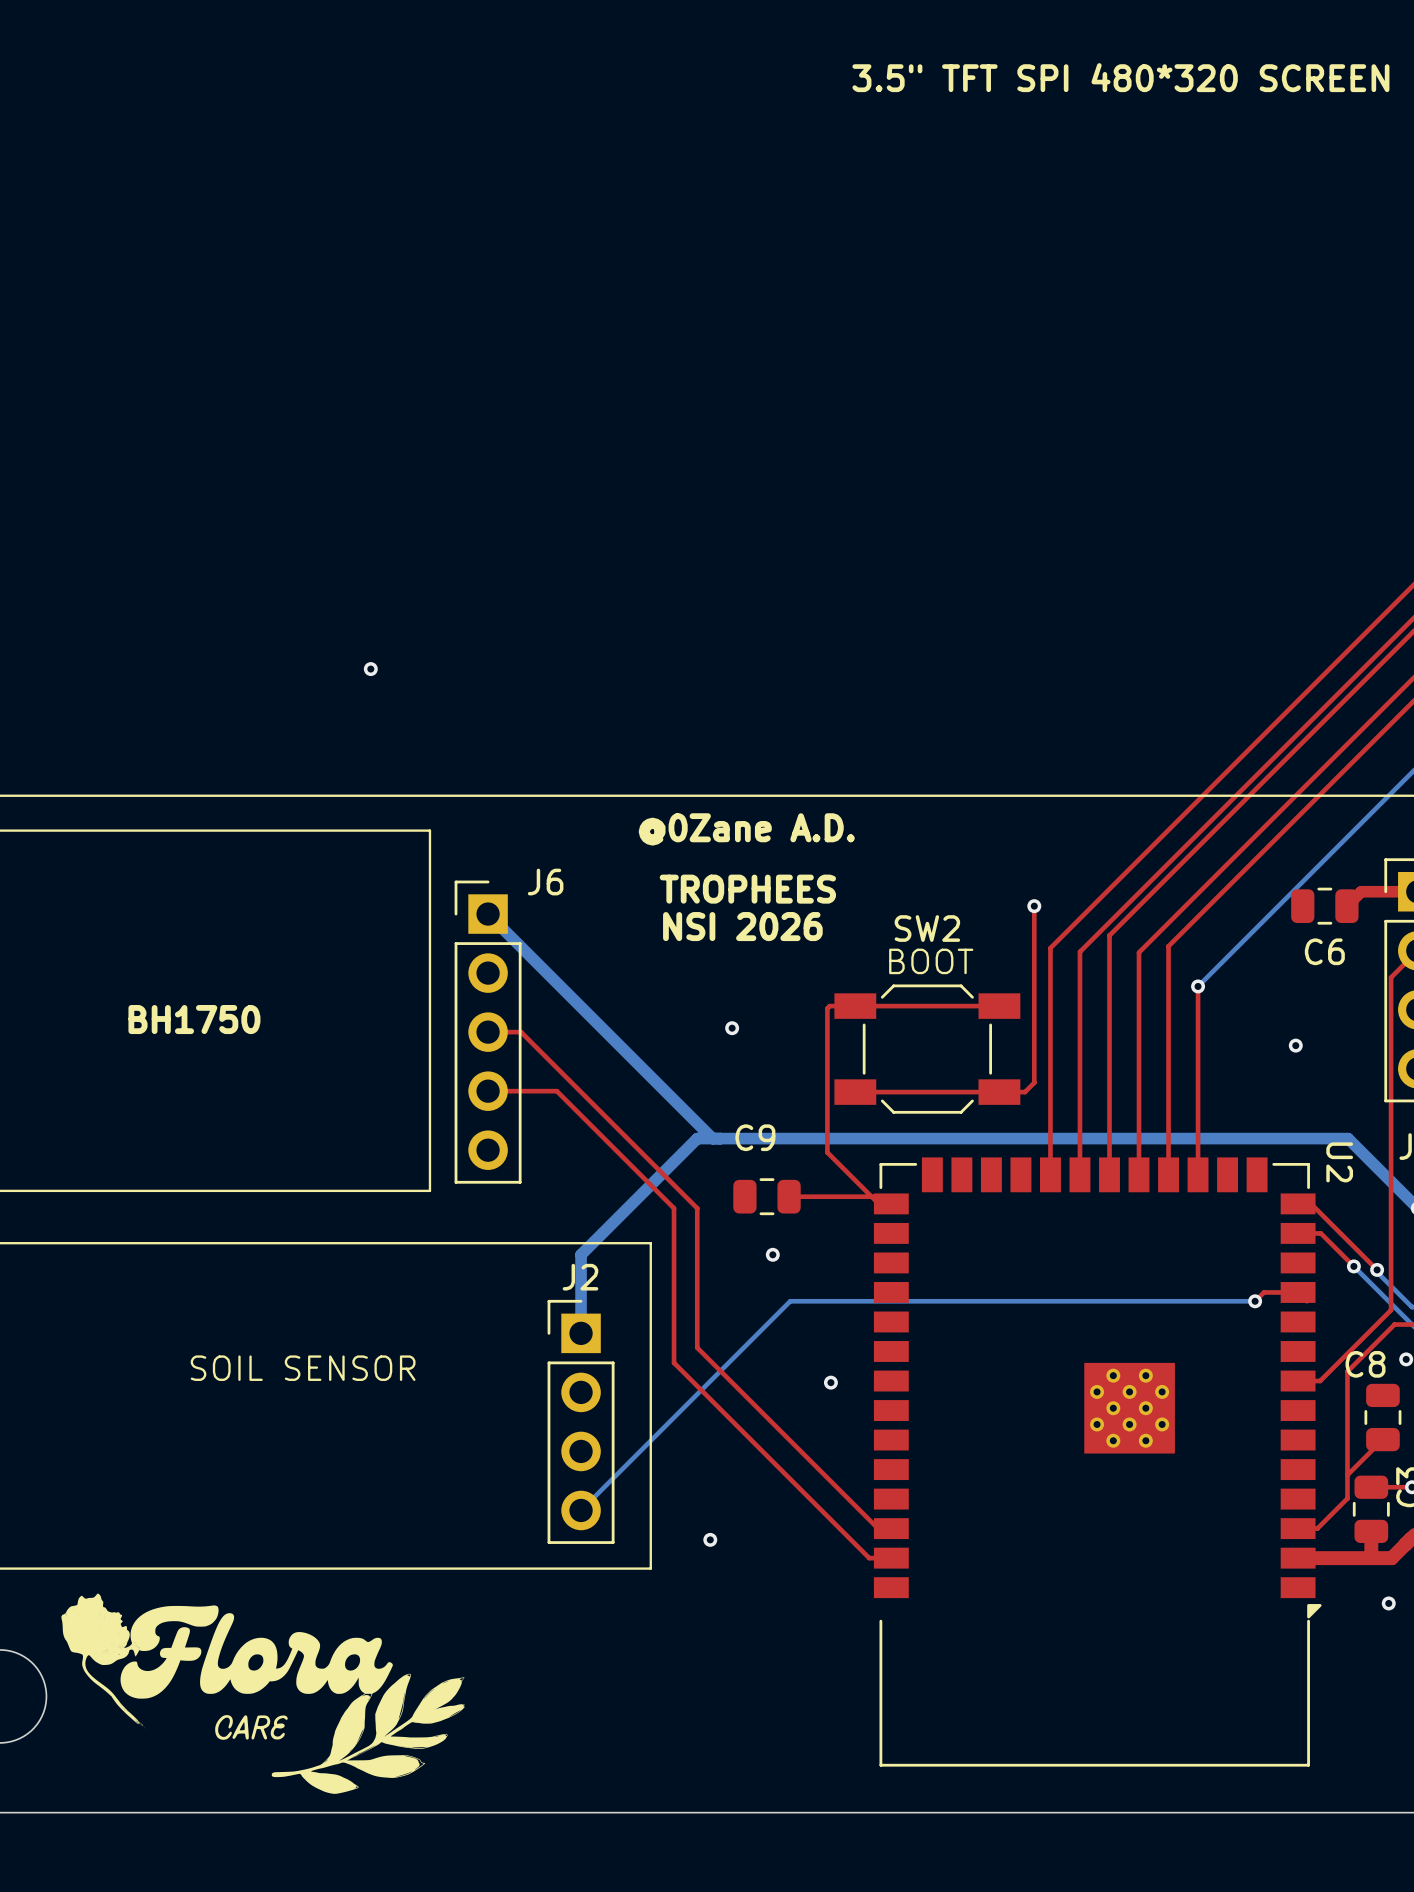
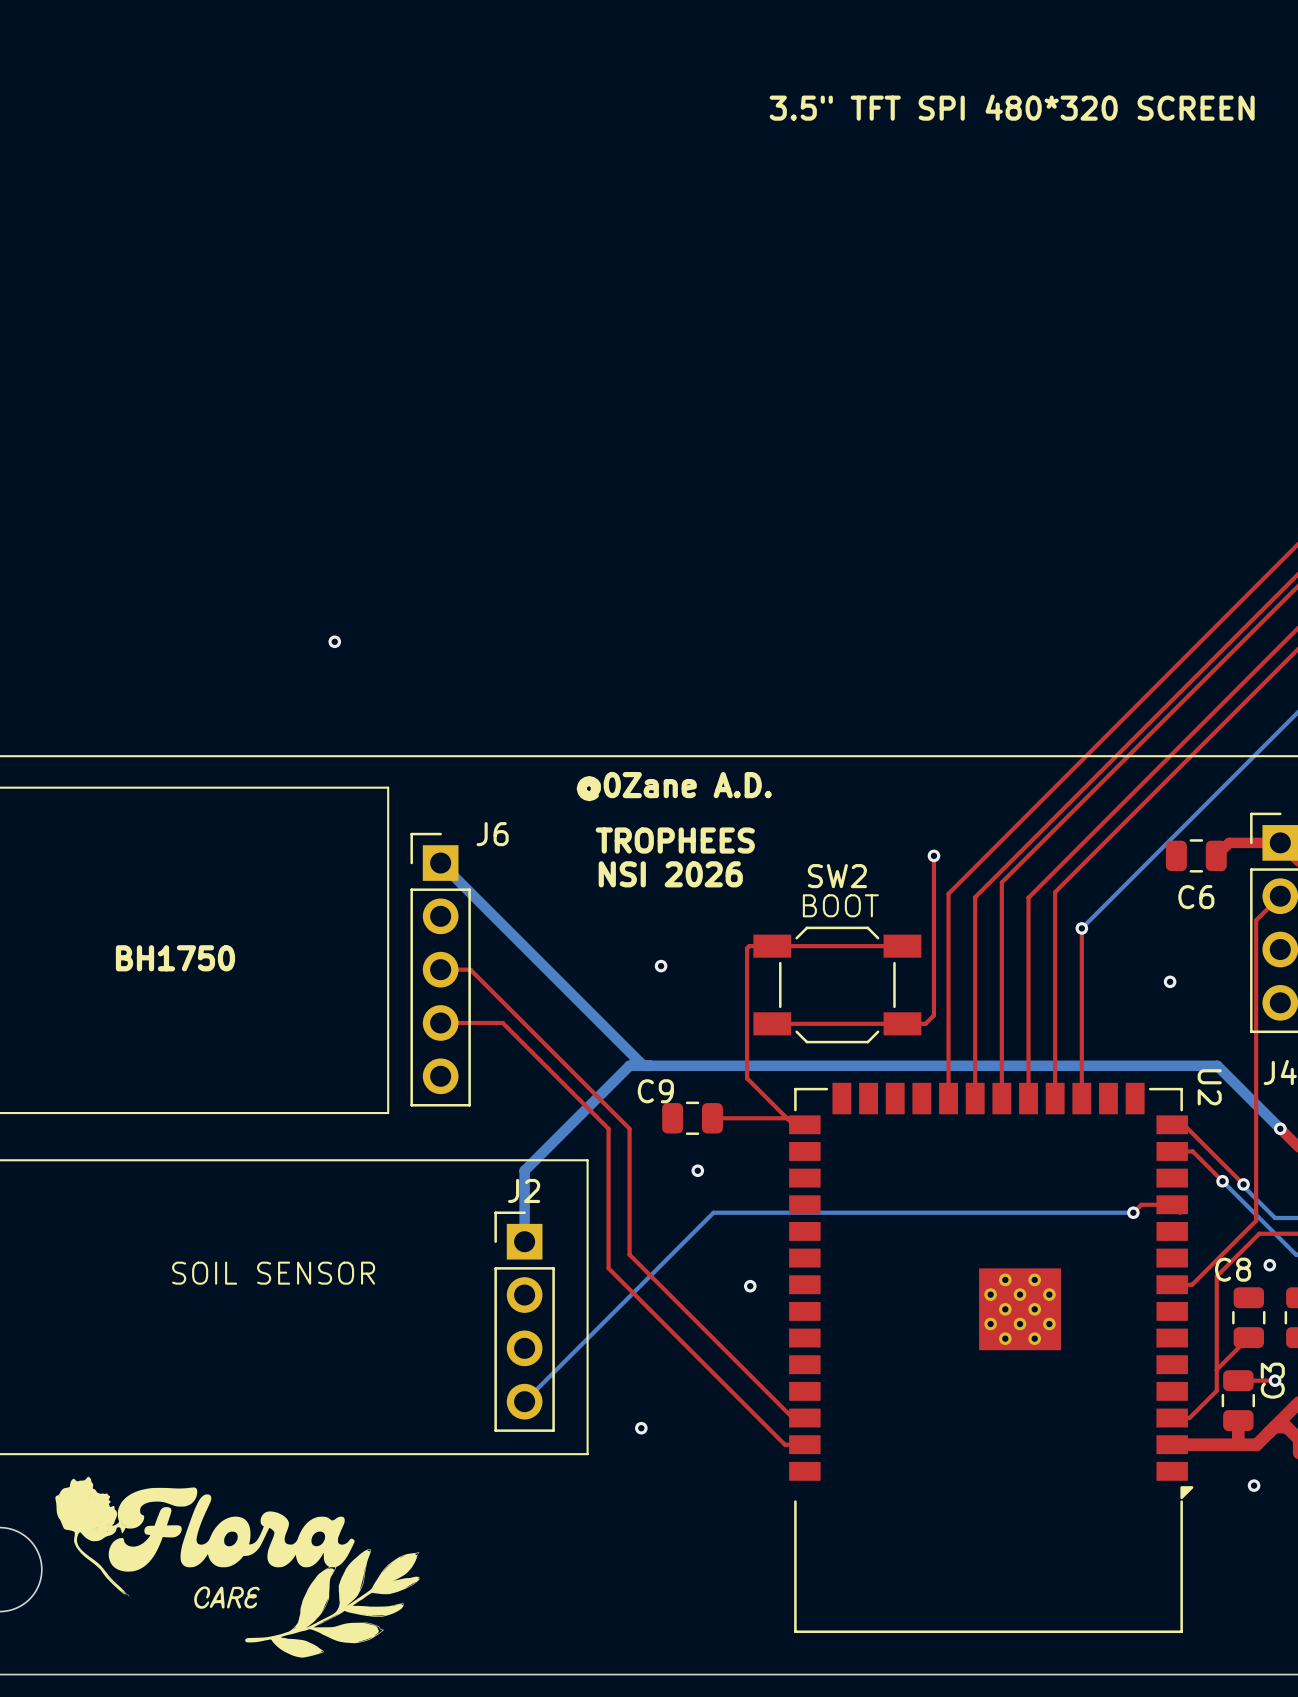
C9 name position: C9 (755, 1137) -> C9 (655, 1091)

